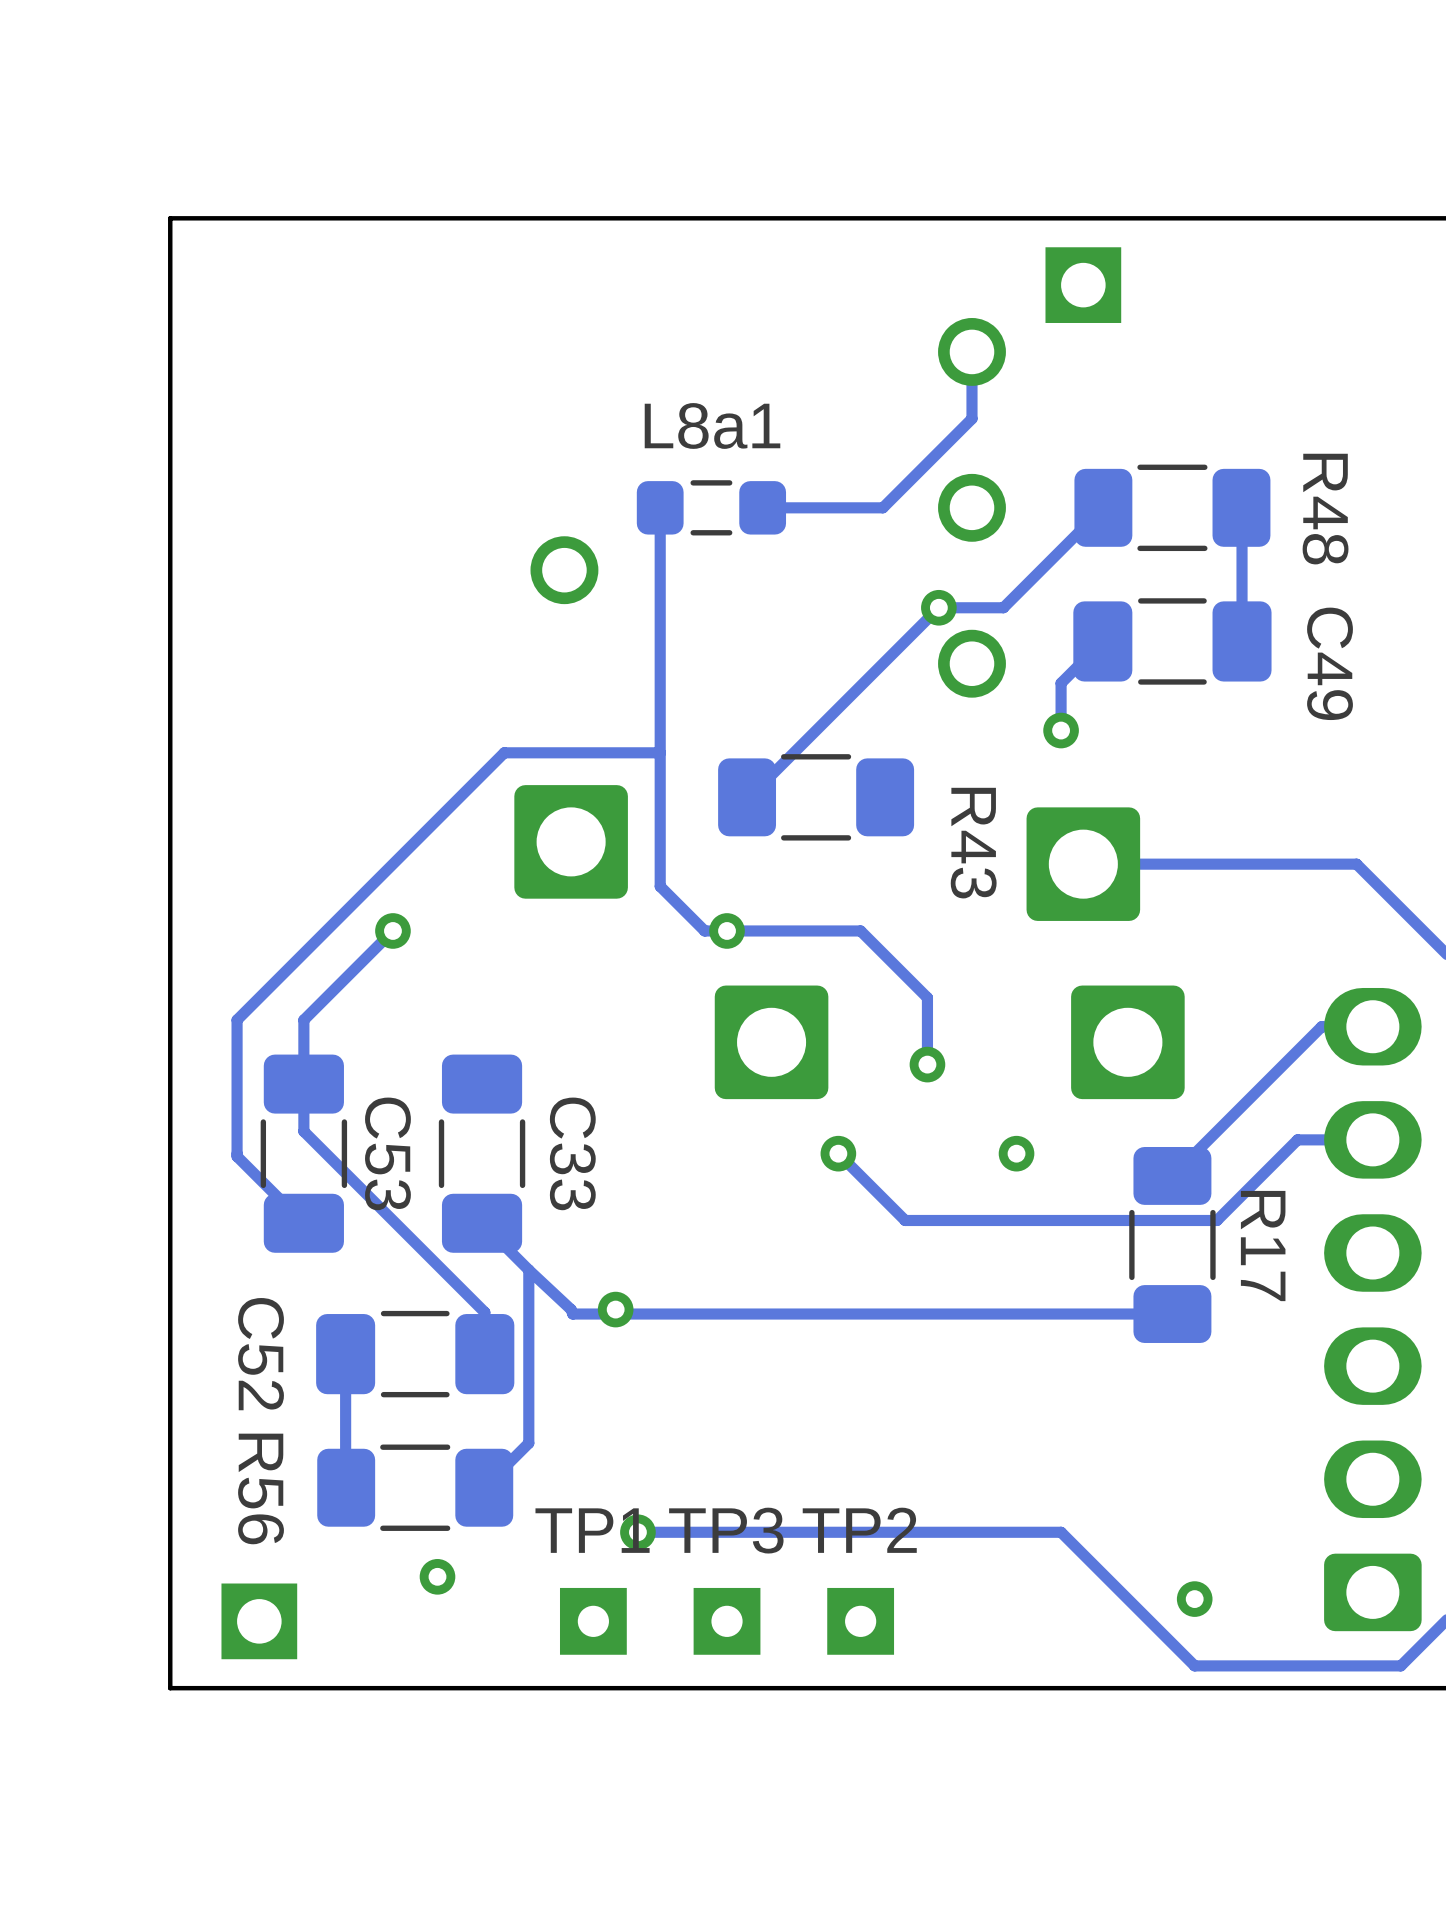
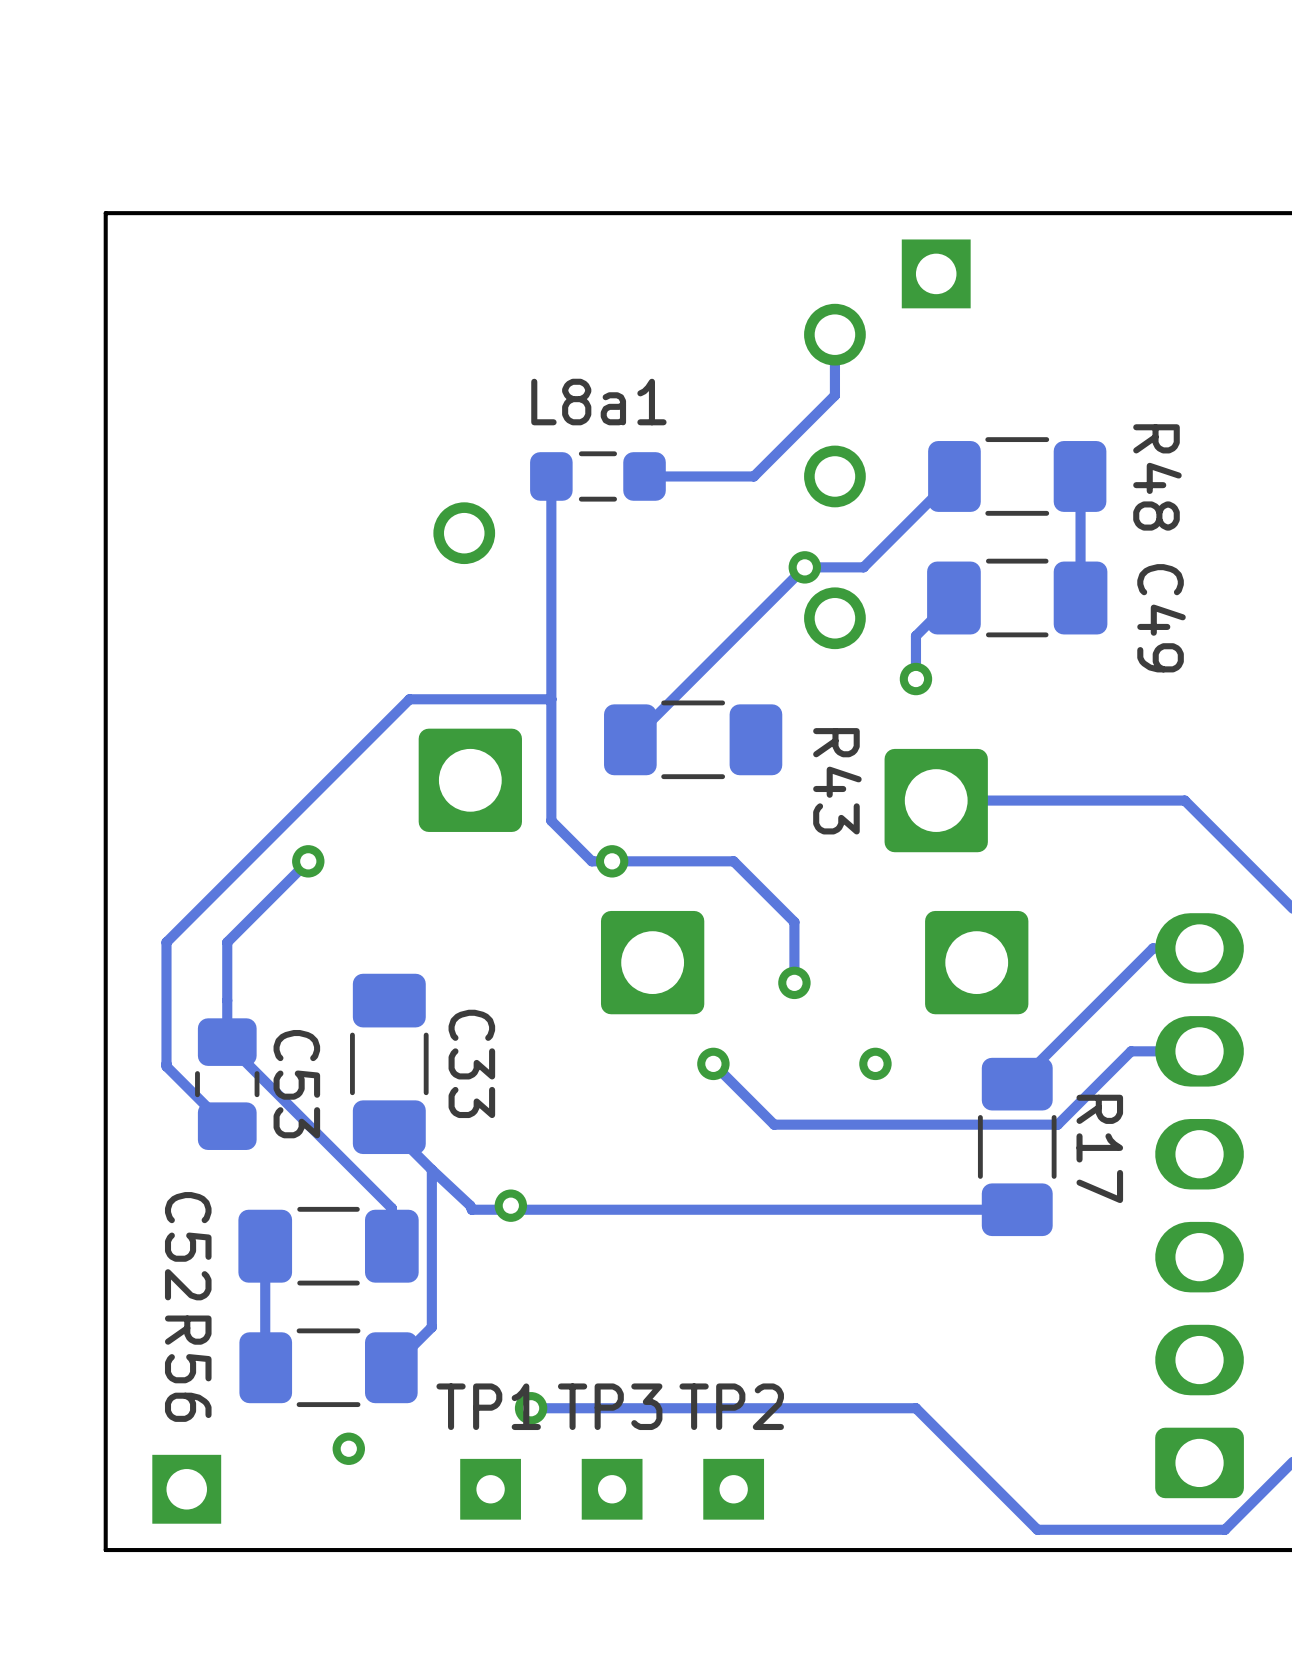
C53 footprint: [260, 1054, 348, 1253] -> [195, 1018, 260, 1150]
via: (1194, 1599) -> none

